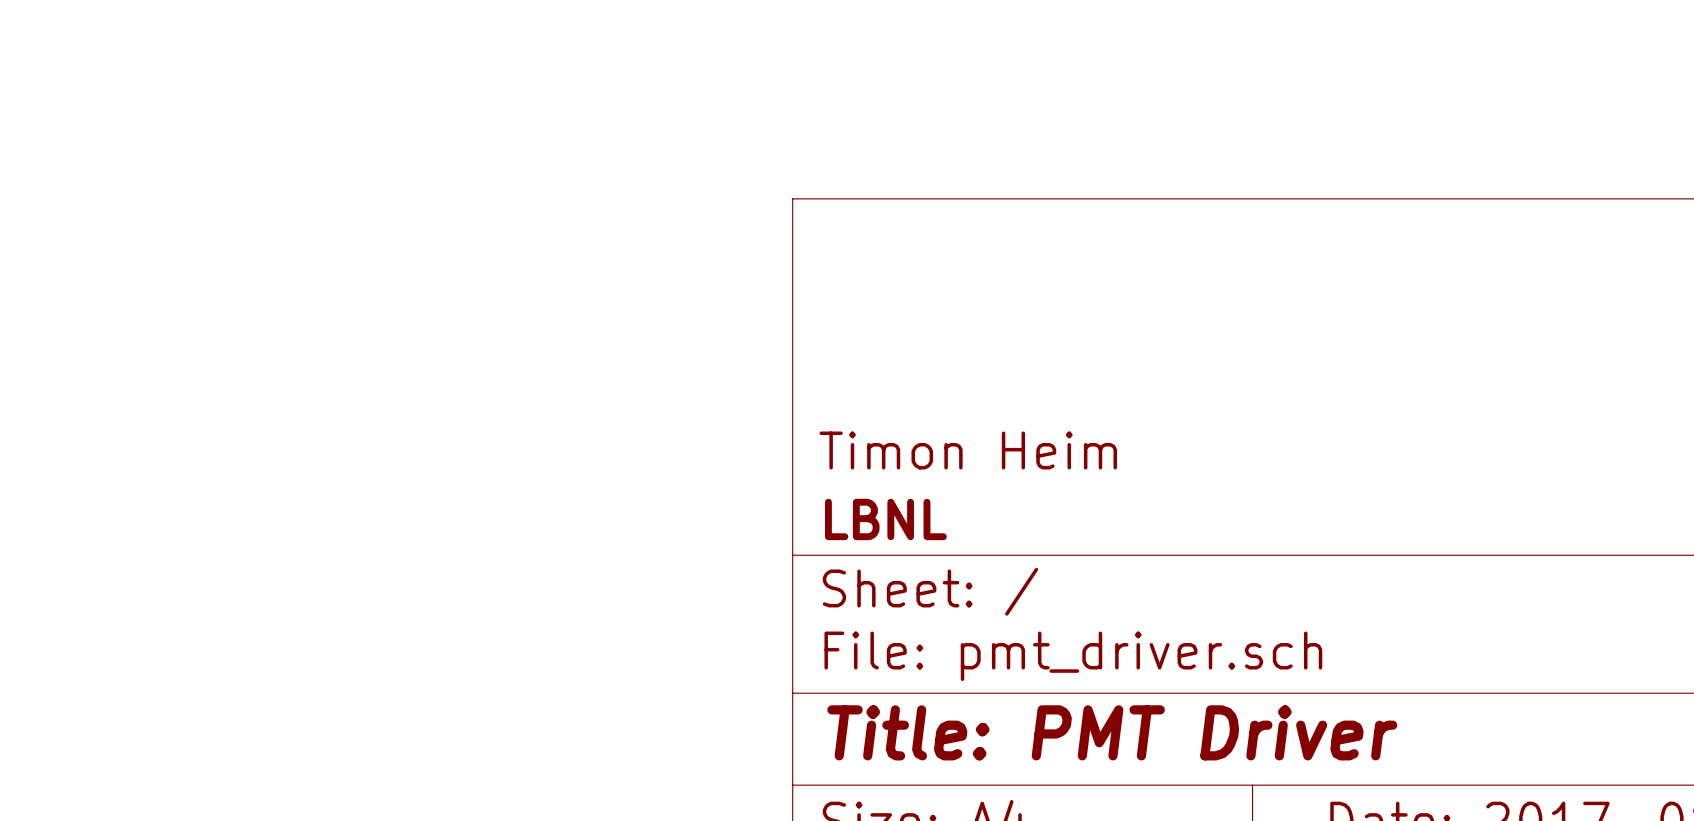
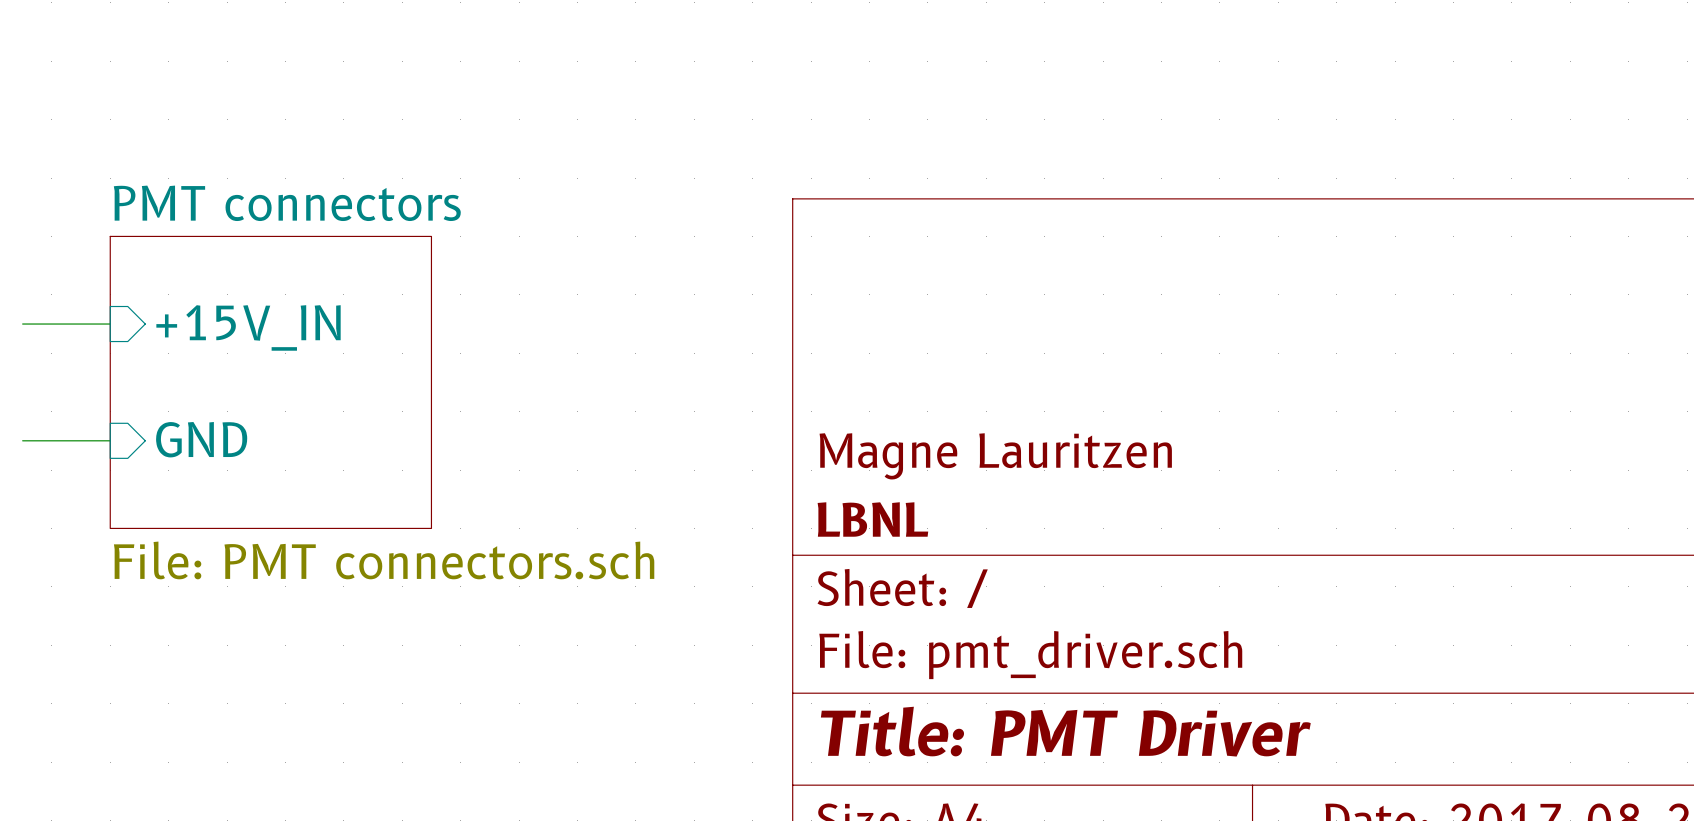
wire: none -> (22, 324) (110, 324)
sheet pin: none -> +15V_IN (248, 327)
sheet PMT connectors: none -> File: PMT connectors.sch (270, 382)
sheet pin: none -> GND (201, 439)
wire: none -> (22, 440) (110, 440)
title block: Timon Heim (968, 450) -> Magne Lauritzen (995, 456)

